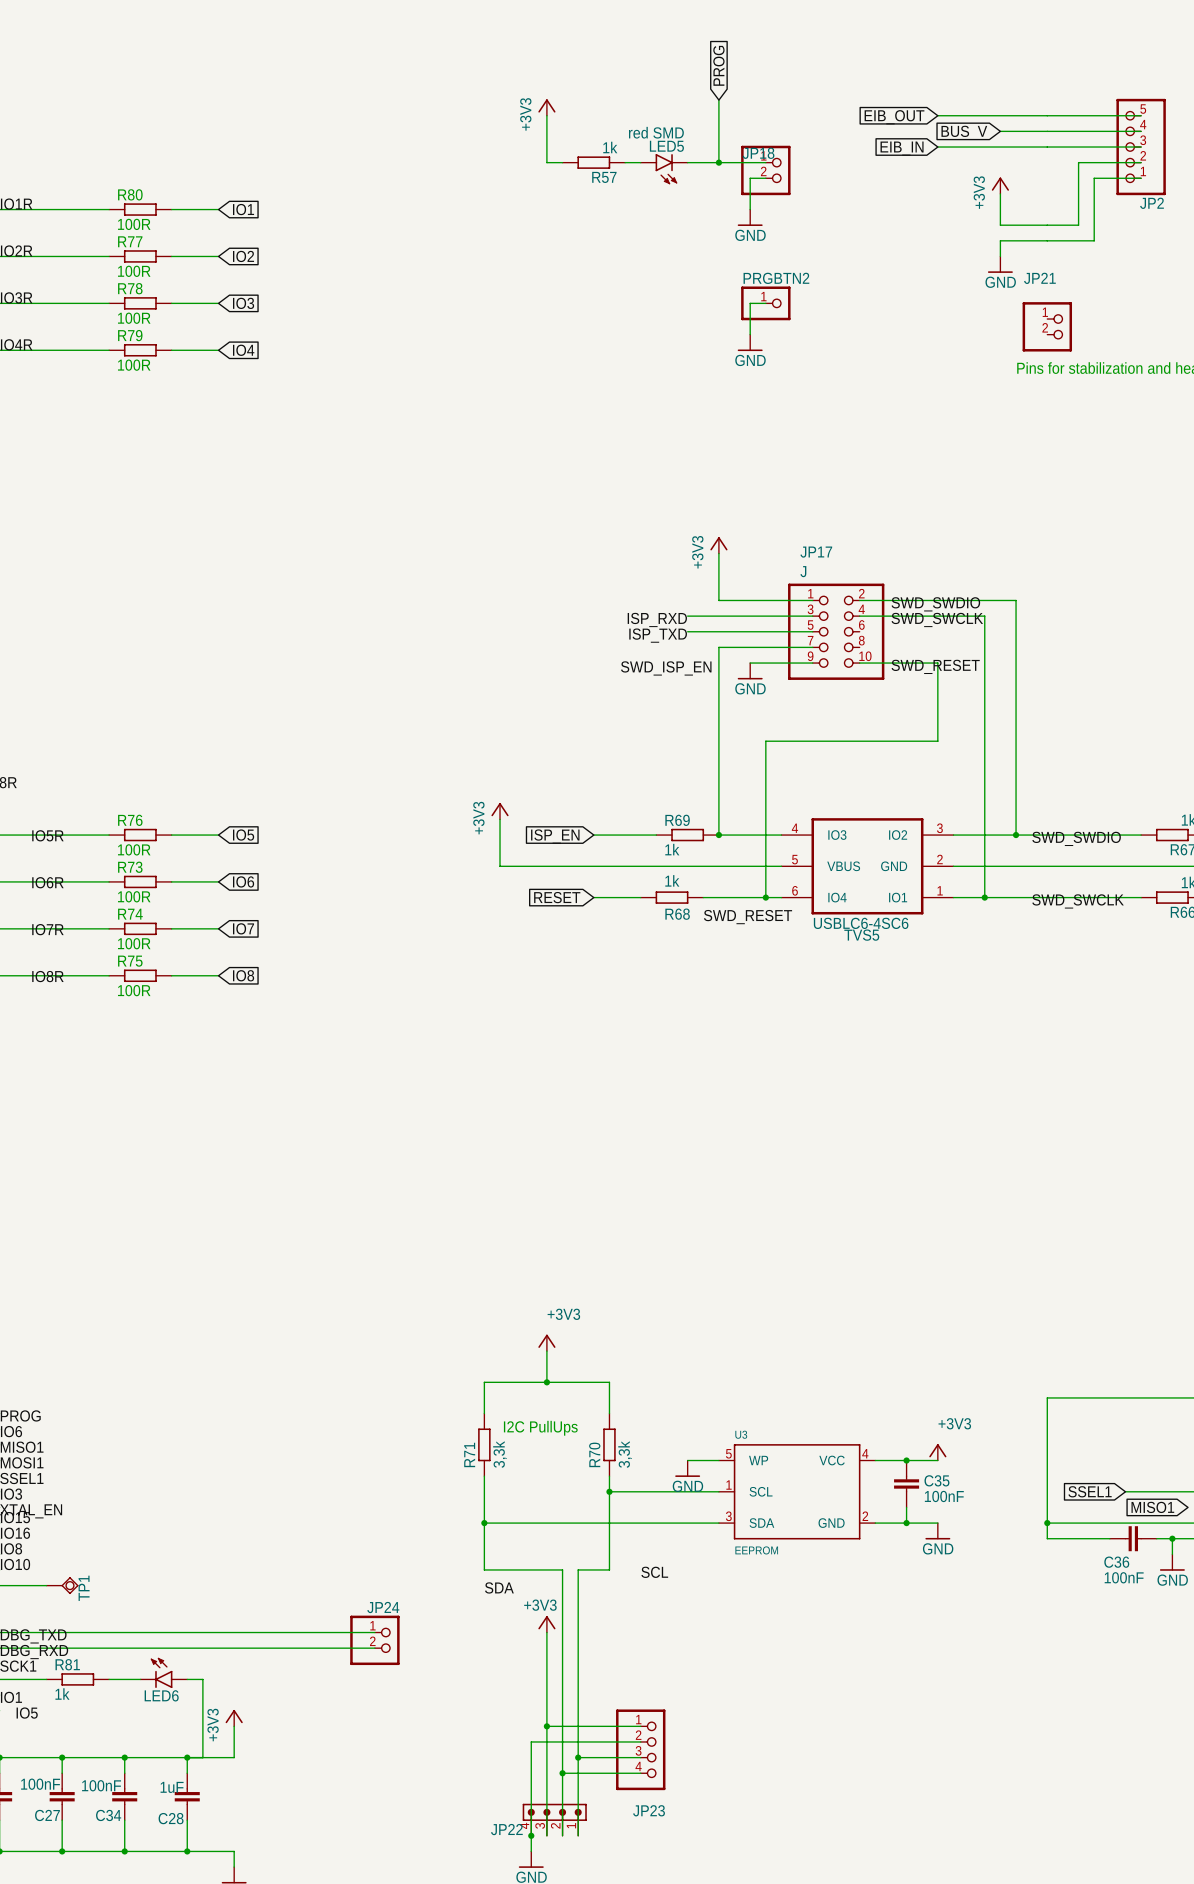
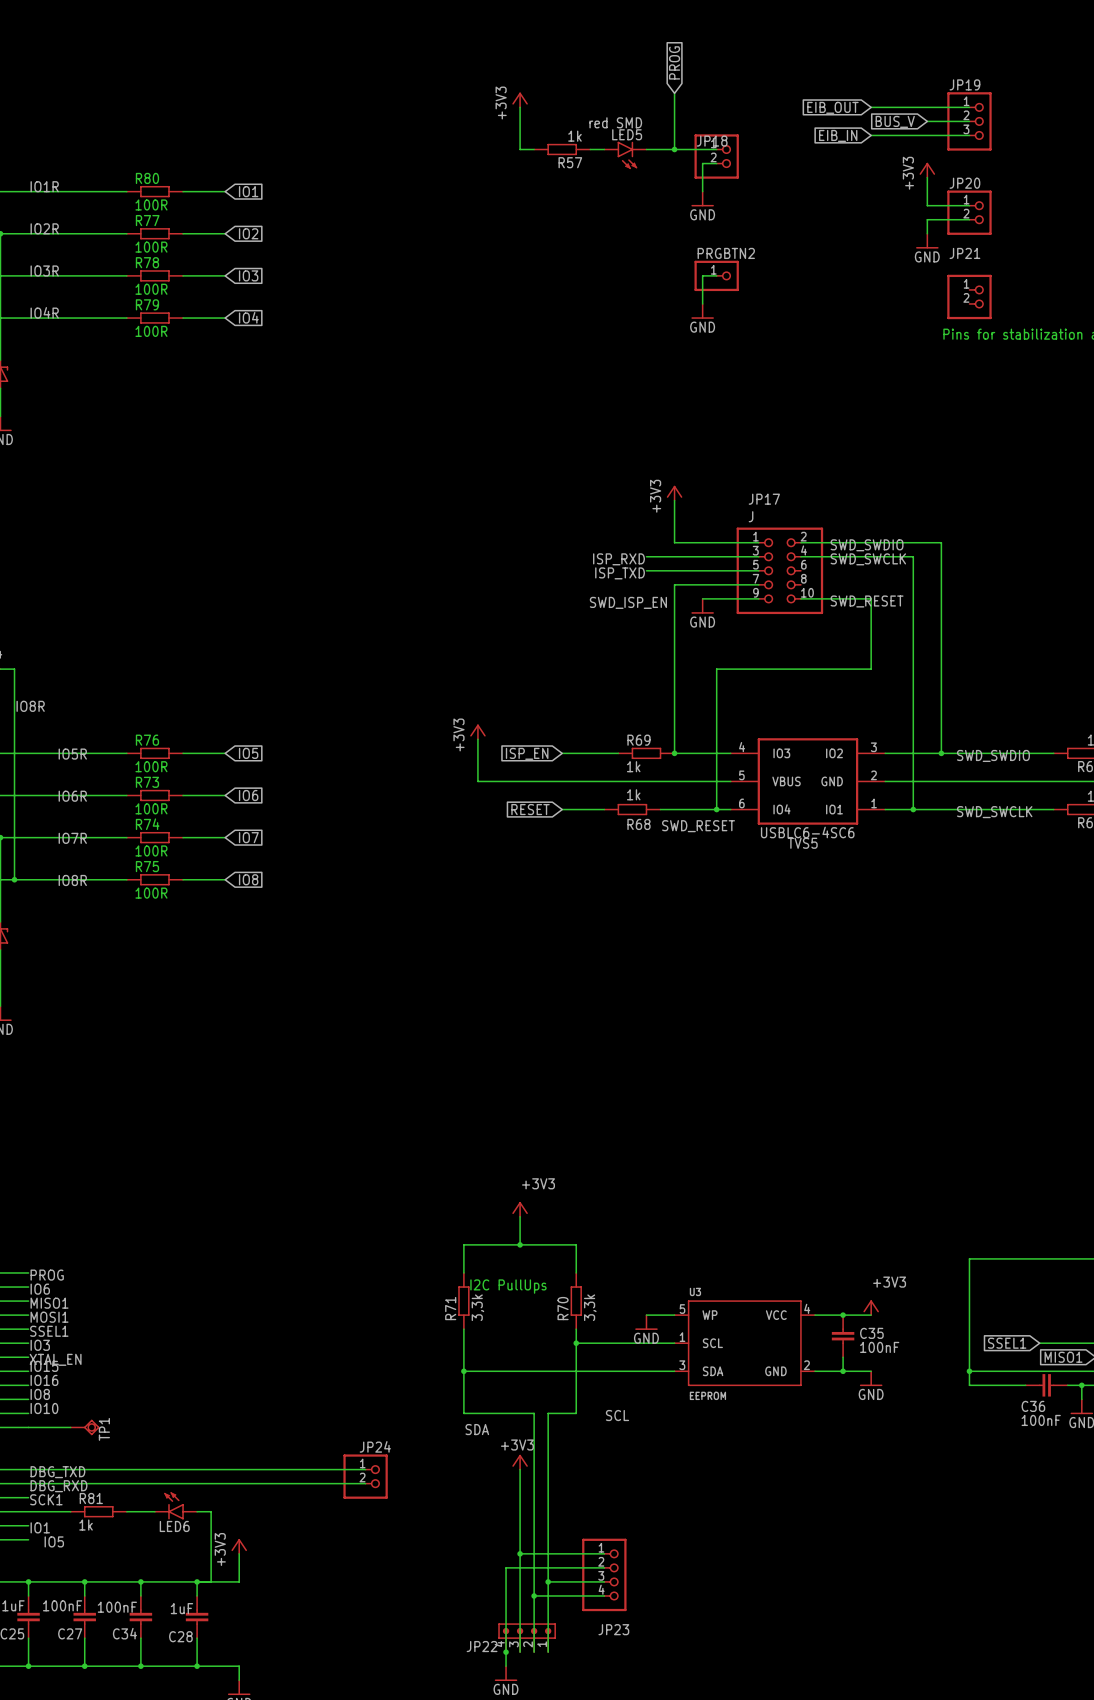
wire: (1047, 115) (1141, 115) -> none
wire: (1047, 131) (1141, 131) -> none
JP19: none -> (969, 121)
wire: (1047, 147) (1141, 147) -> none
JP2: (1141, 147) -> none
wire: (1141, 162) (1078, 162) (1078, 225) (1047, 225) -> none
wire: (1141, 178) (1094, 178) (1094, 240) (1047, 240) -> none
JP20: none -> (969, 212)

